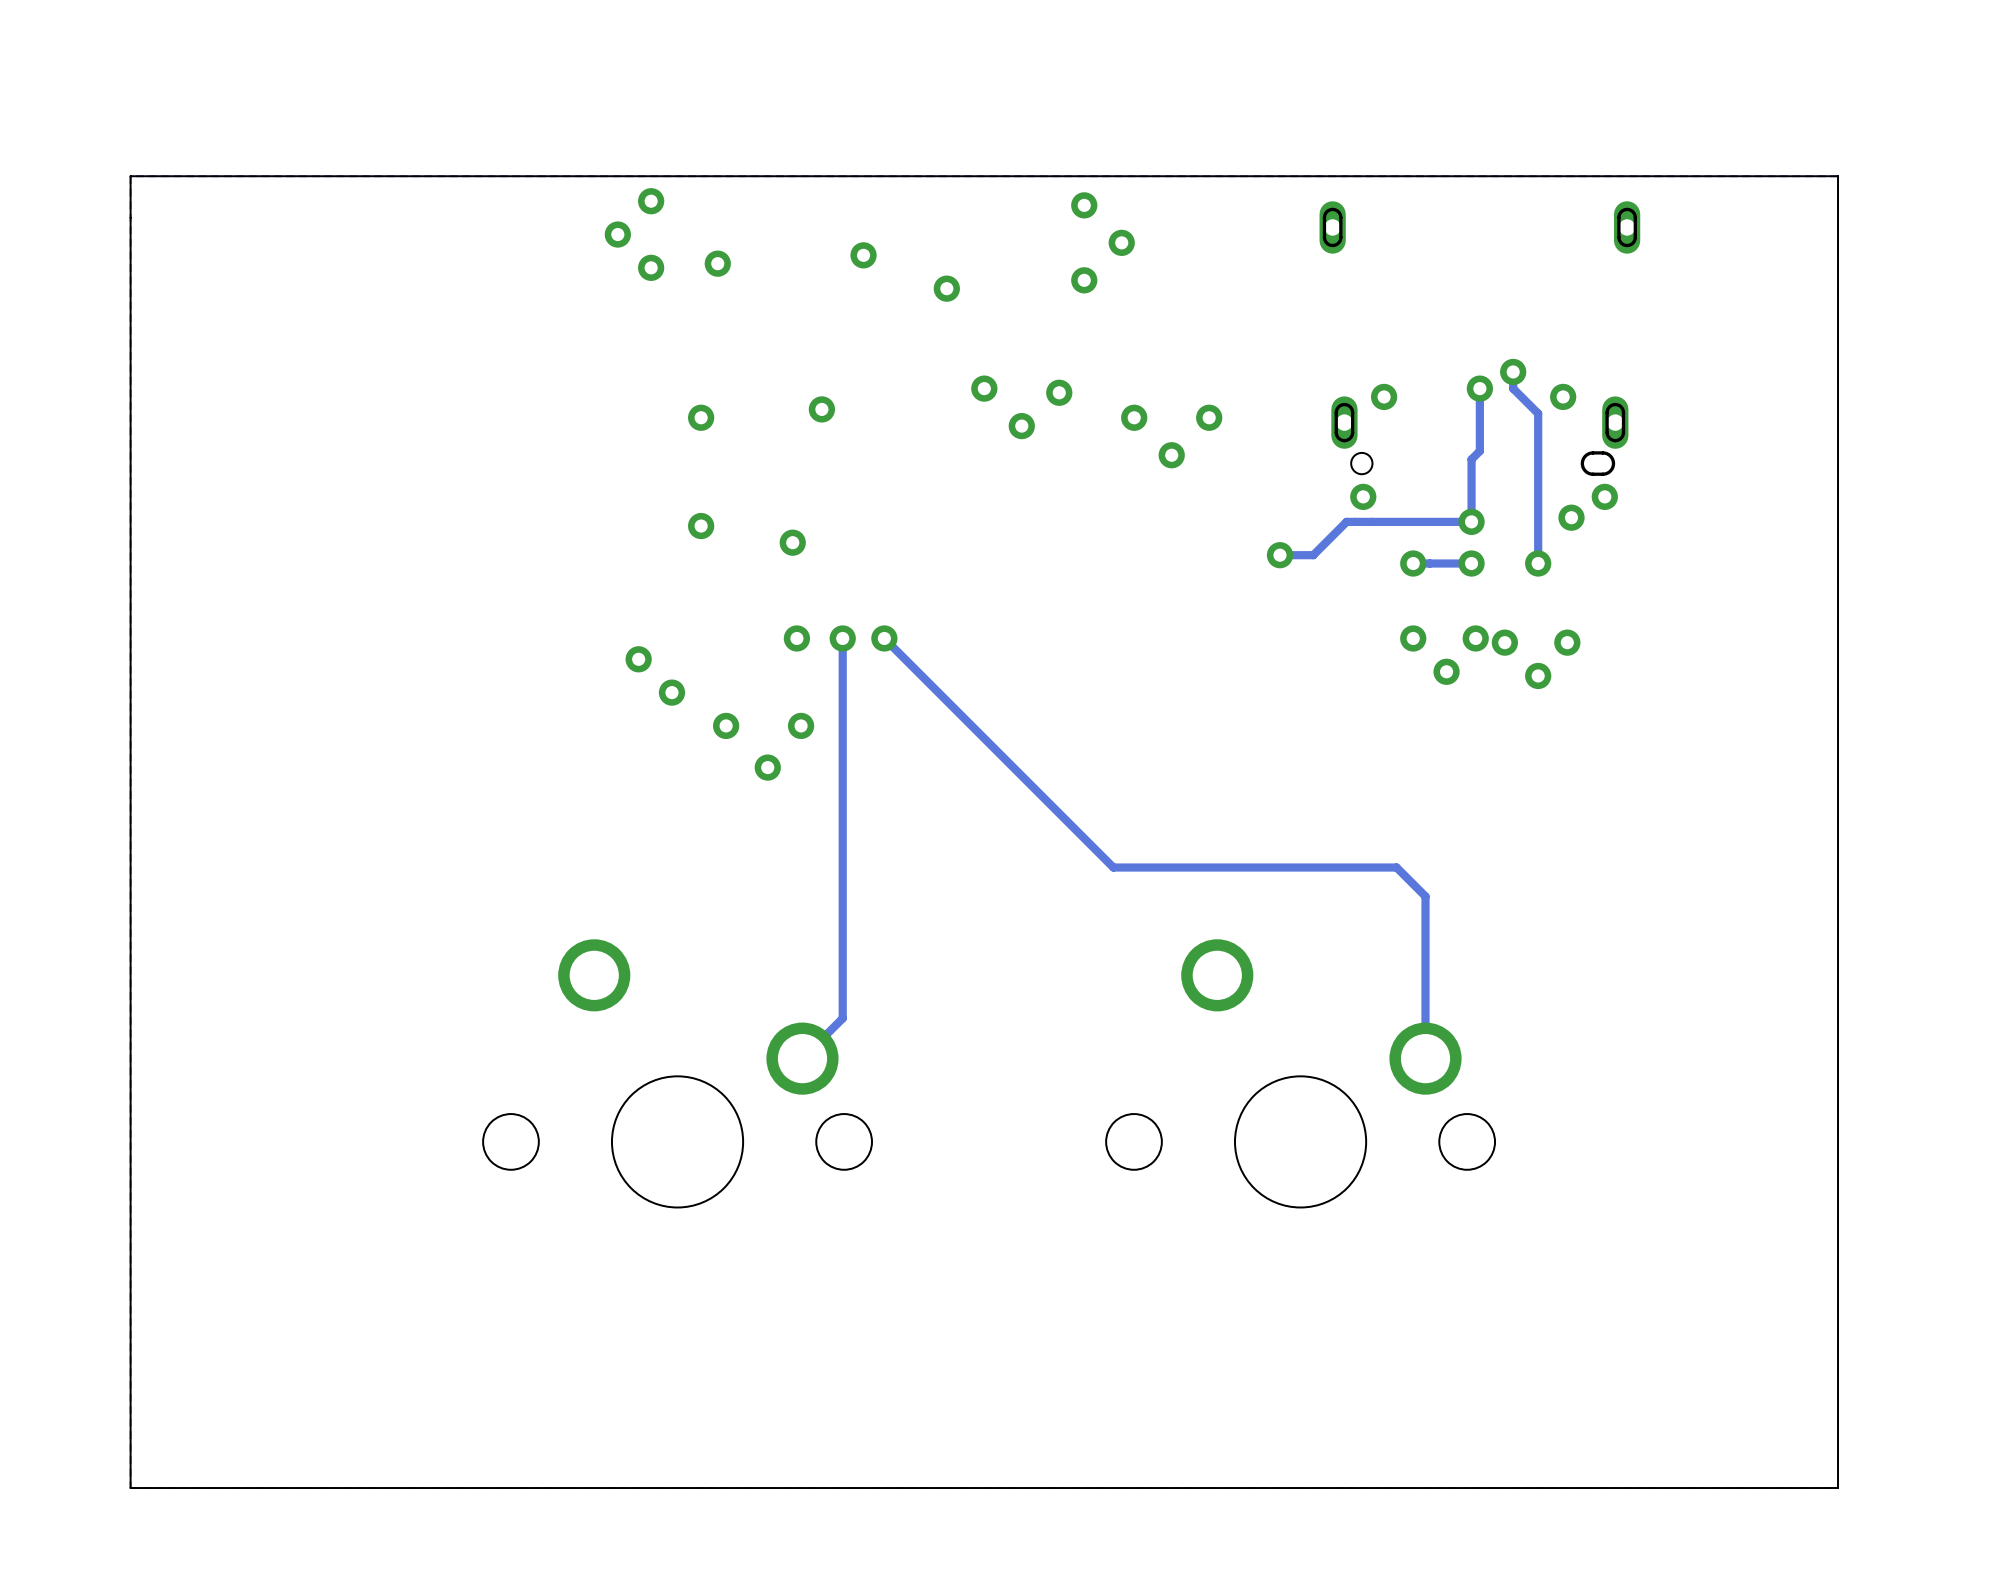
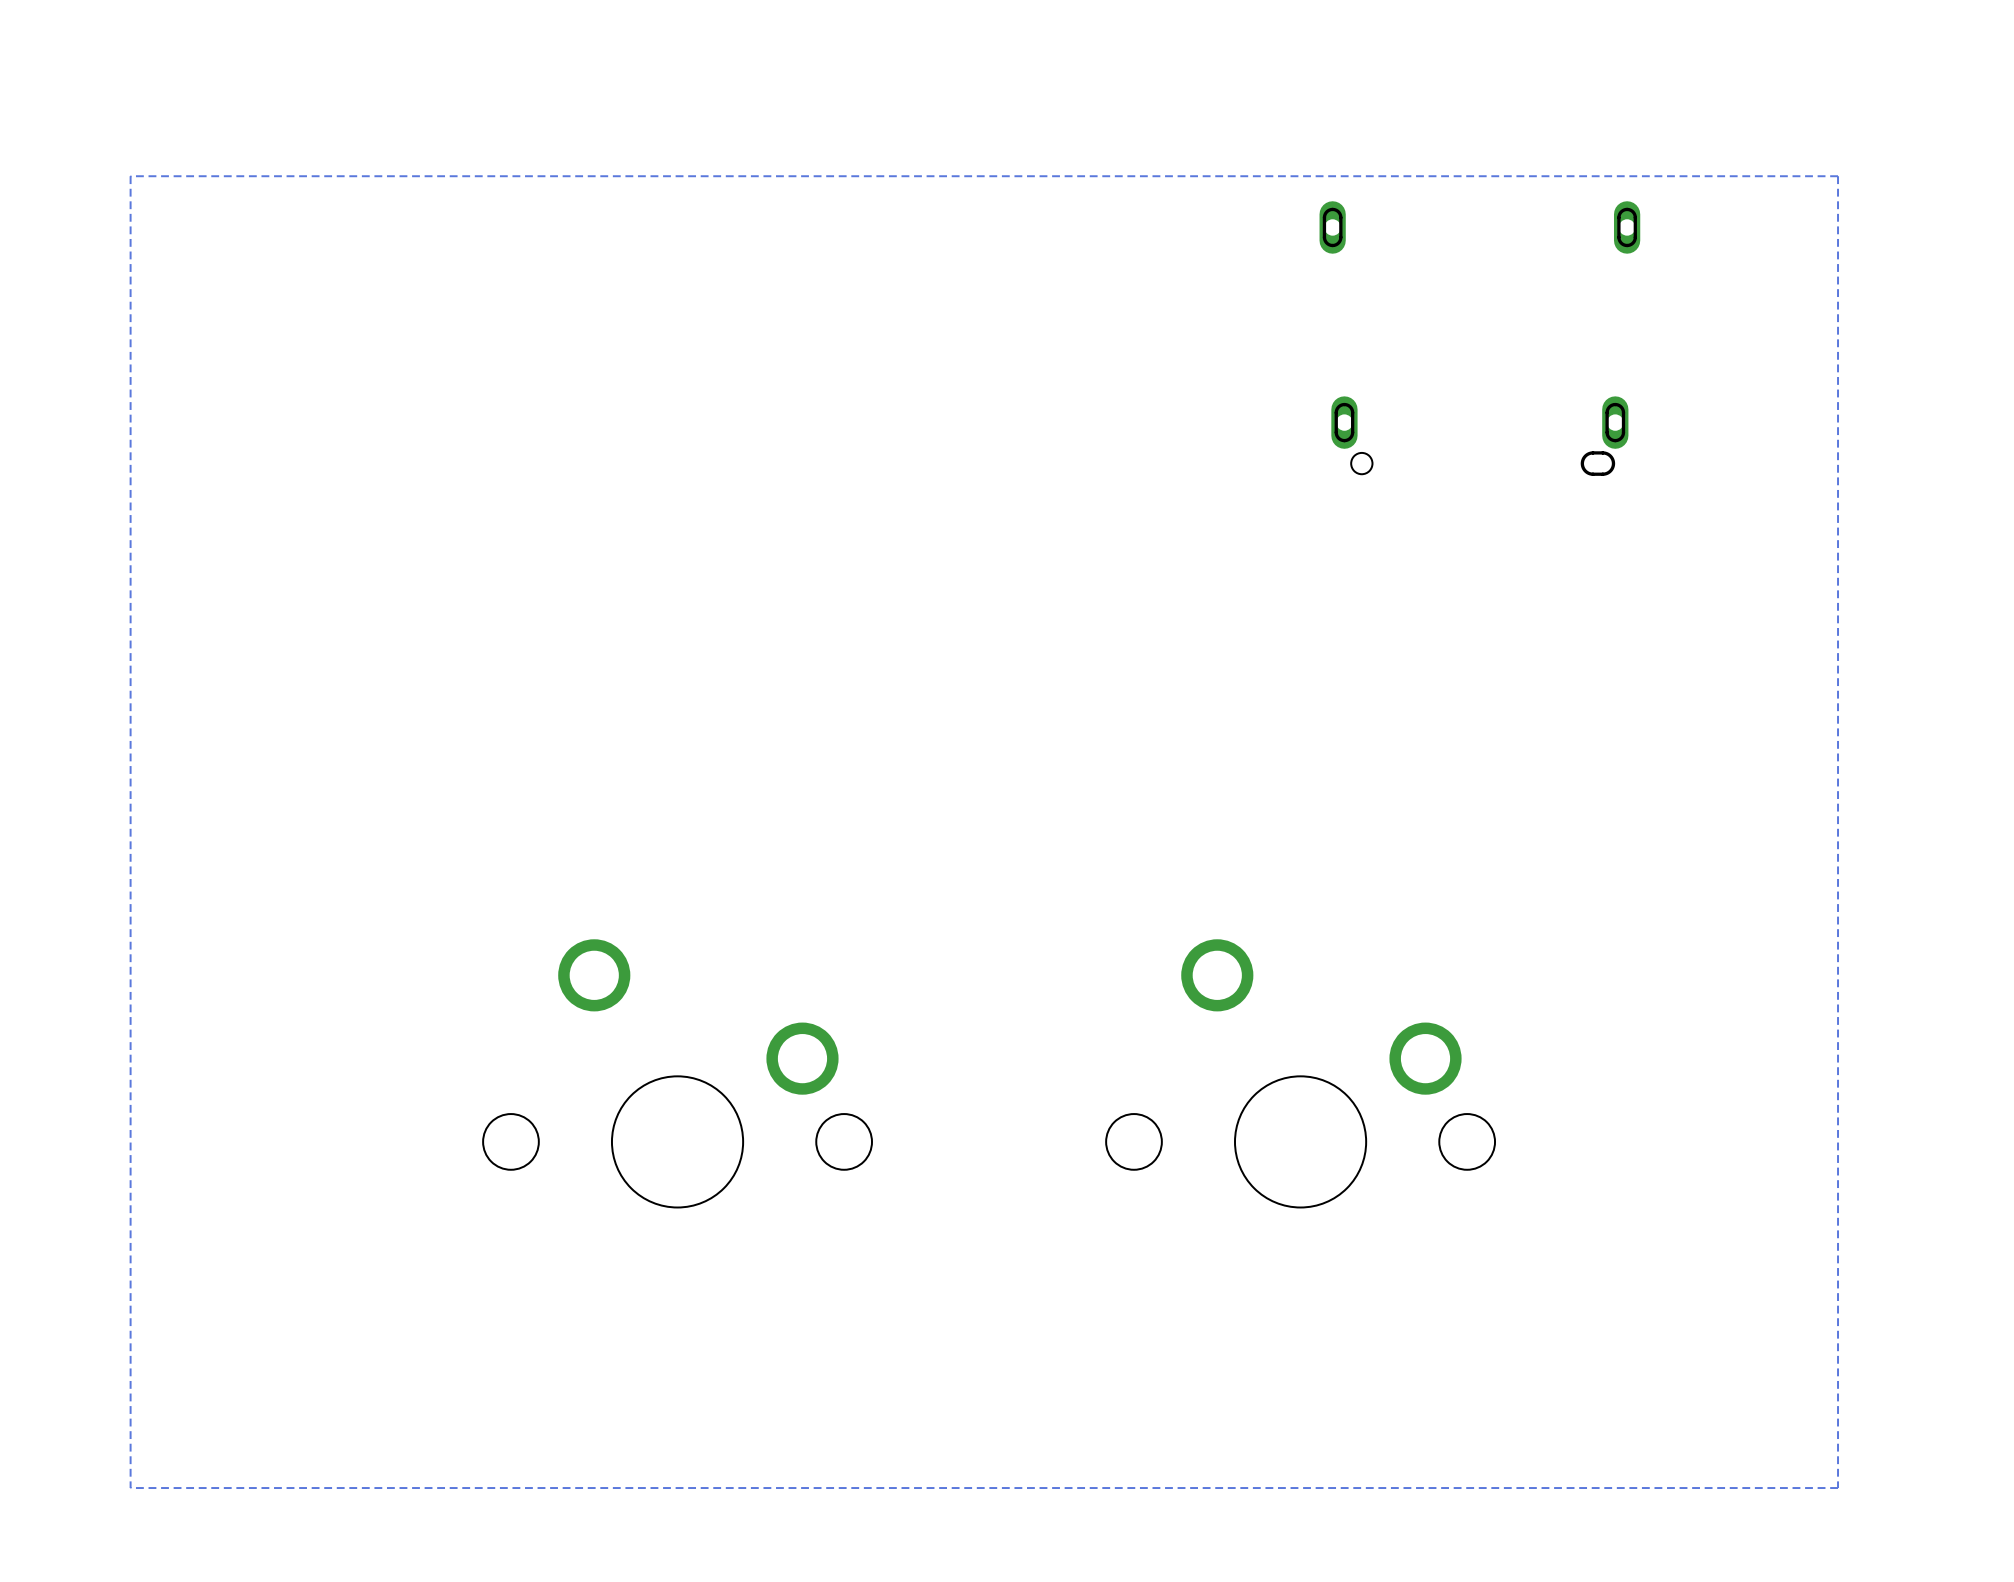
board edge: (1838, 176) (130, 176) (130, 1488) (1838, 1488) (1838, 176) -> none
via: (651, 201) -> none
via: (1084, 205) -> none
via: (617, 234) -> none
via: (1121, 242) -> none
via: (863, 255) -> none
via: (717, 263) -> none
via: (651, 267) -> none
via: (1084, 280) -> none
via: (946, 288) -> none
via: (1513, 371) -> none
track: (1521, 371) (1513, 371) (1513, 388) (1538, 413) (1538, 563) -> none
via: (984, 388) -> none
track: (1479, 388) (1479, 451) (1471, 459) (1471, 521) (1346, 521) (1313, 555) (1279, 555) -> none
via: (1479, 388) -> none
via: (1059, 392) -> none
via: (1384, 396) -> none
via: (1563, 396) -> none
via: (821, 409) -> none
via: (701, 417) -> none
via: (1134, 417) -> none
via: (1209, 417) -> none
via: (1021, 426) -> none
via: (1171, 455) -> none
via: (1363, 496) -> none
via: (1604, 496) -> none
via: (1571, 517) -> none
via: (1471, 521) -> none
via: (701, 526) -> none
via: (792, 542) -> none
via: (1279, 555) -> none
via: (1413, 563) -> none
track: (1471, 563) (1413, 563) -> none
via: (1471, 563) -> none
via: (1538, 563) -> none
via: (796, 638) -> none
track: (842, 638) (842, 1018) (802, 1058) -> none
via: (842, 638) -> none
track: (884, 638) (1113, 867) (1396, 867) (1425, 896) (1425, 1058) -> none
via: (884, 638) -> none
via: (1413, 638) -> none
via: (1475, 638) -> none
via: (1504, 642) -> none
via: (1567, 642) -> none
via: (638, 659) -> none
via: (1446, 671) -> none
via: (1538, 675) -> none
via: (671, 692) -> none
via: (726, 725) -> none
via: (801, 725) -> none
via: (767, 767) -> none

